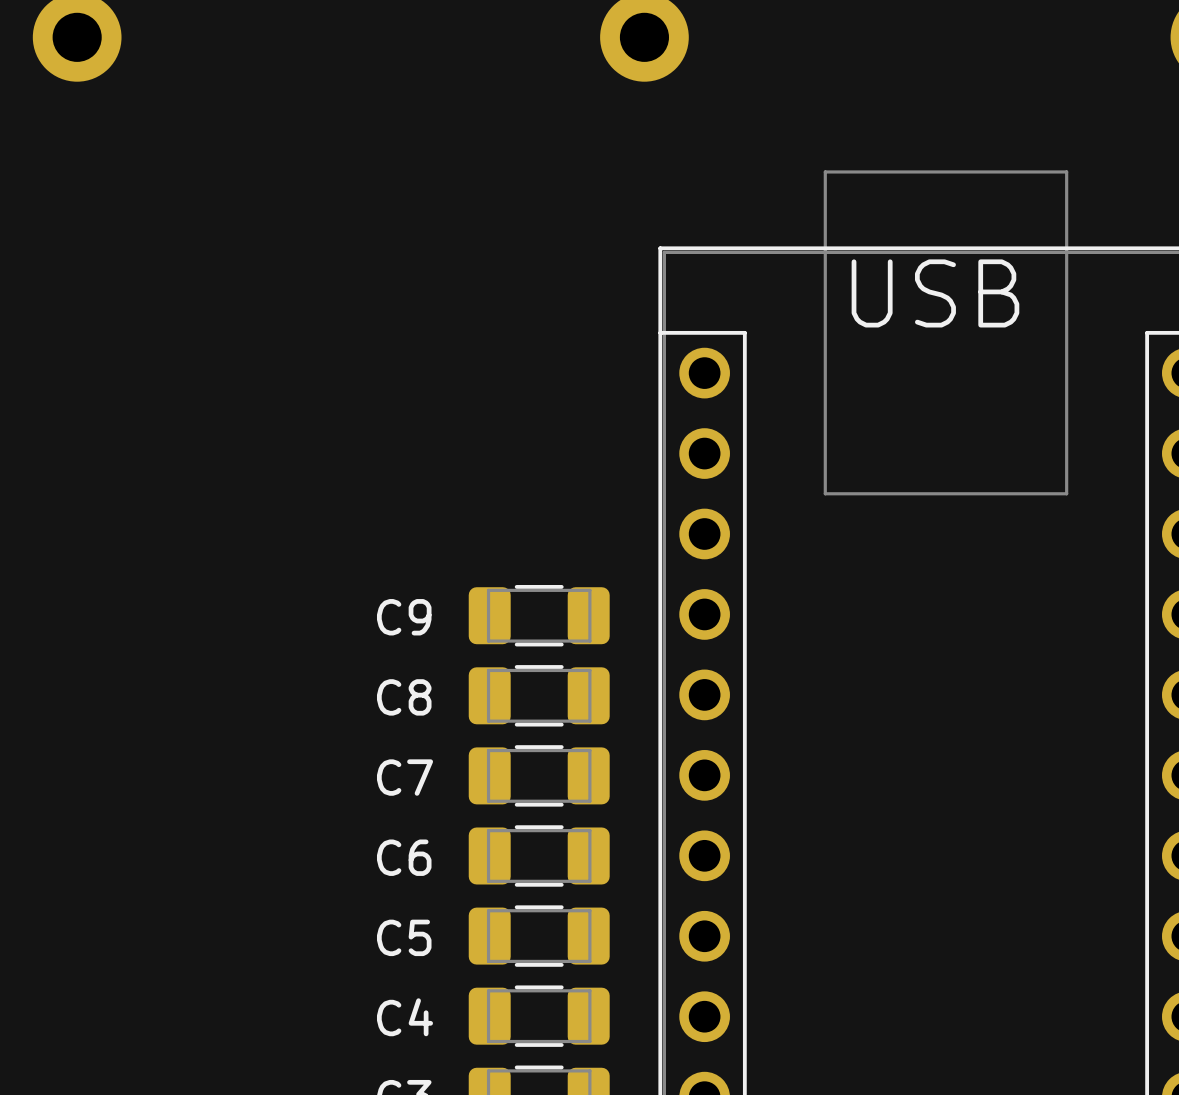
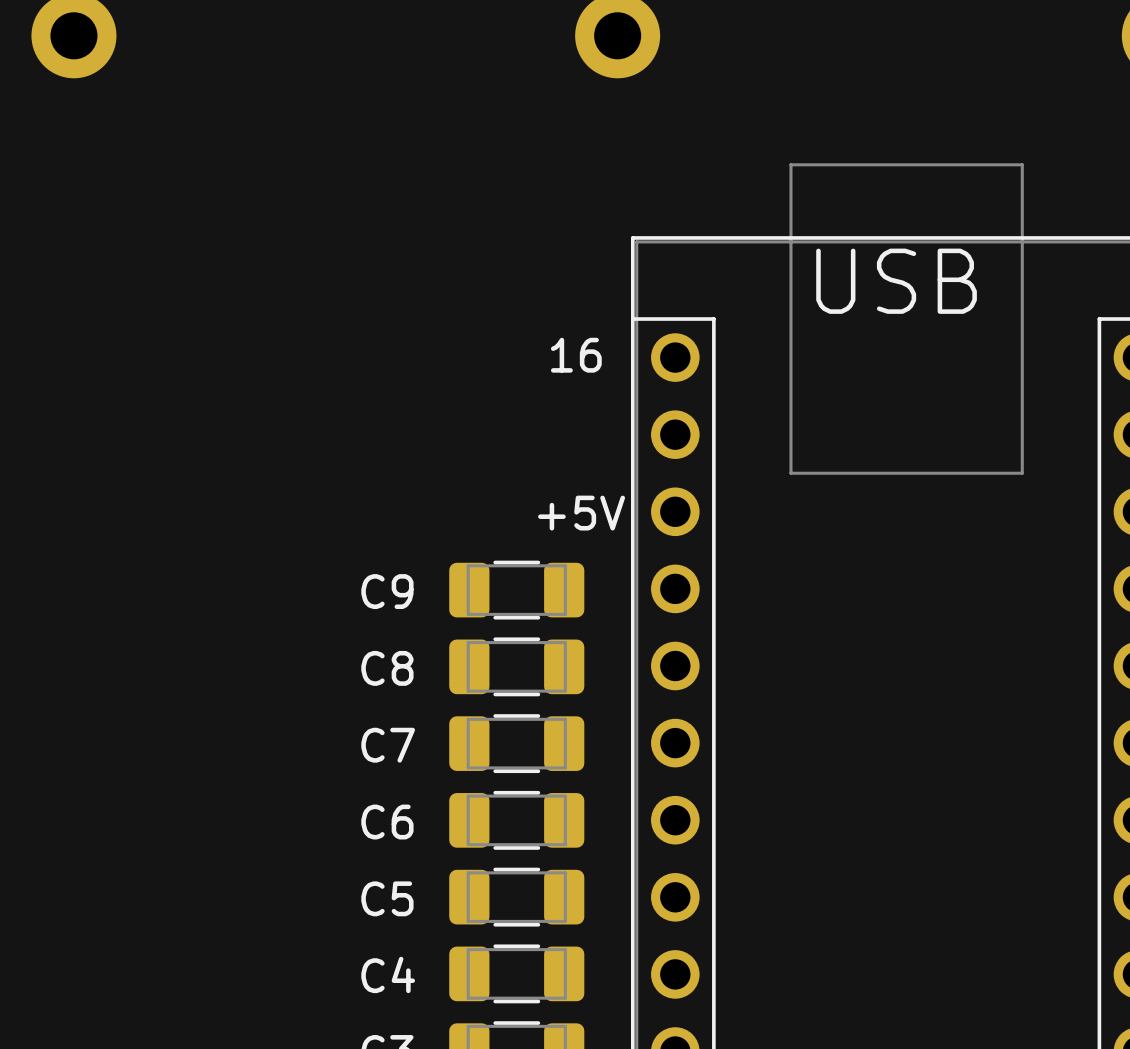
text: none -> 16 (576, 355)
text: none -> +5V (581, 513)

